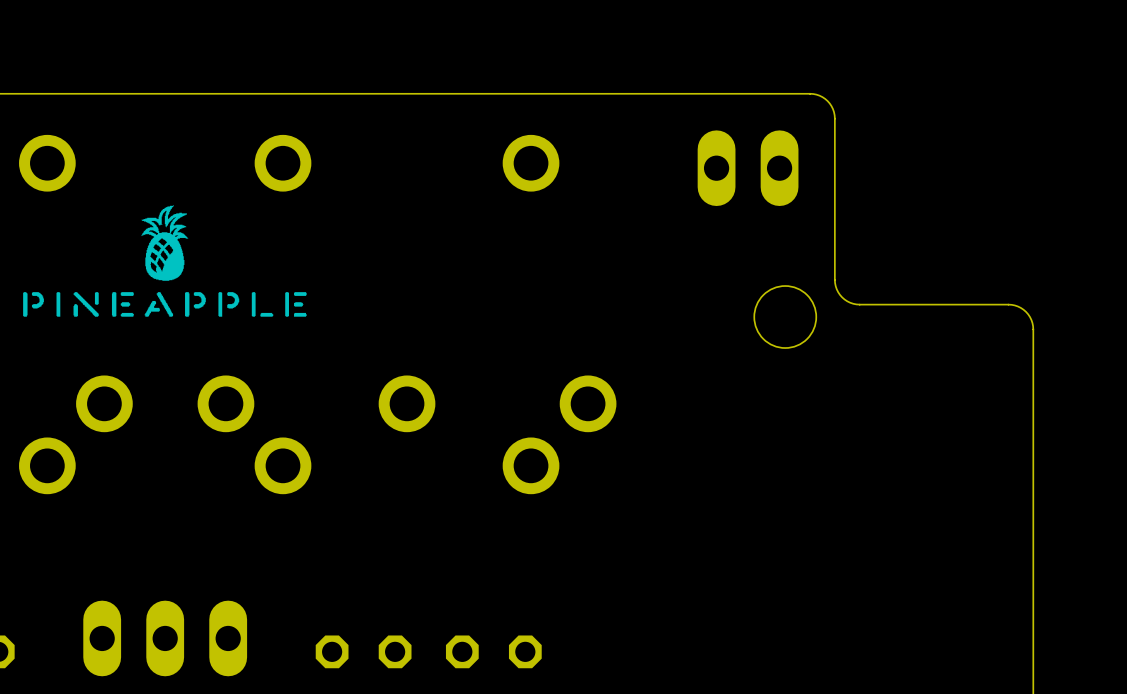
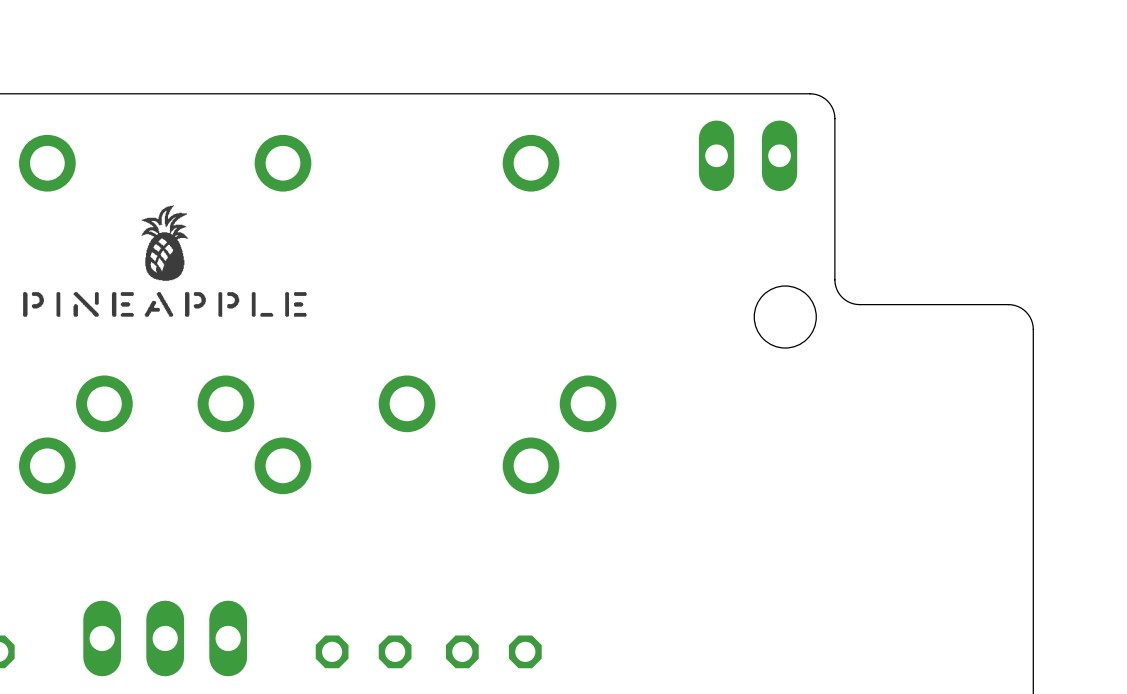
part footprint: [697, 130, 799, 207] -> [698, 120, 798, 192]

